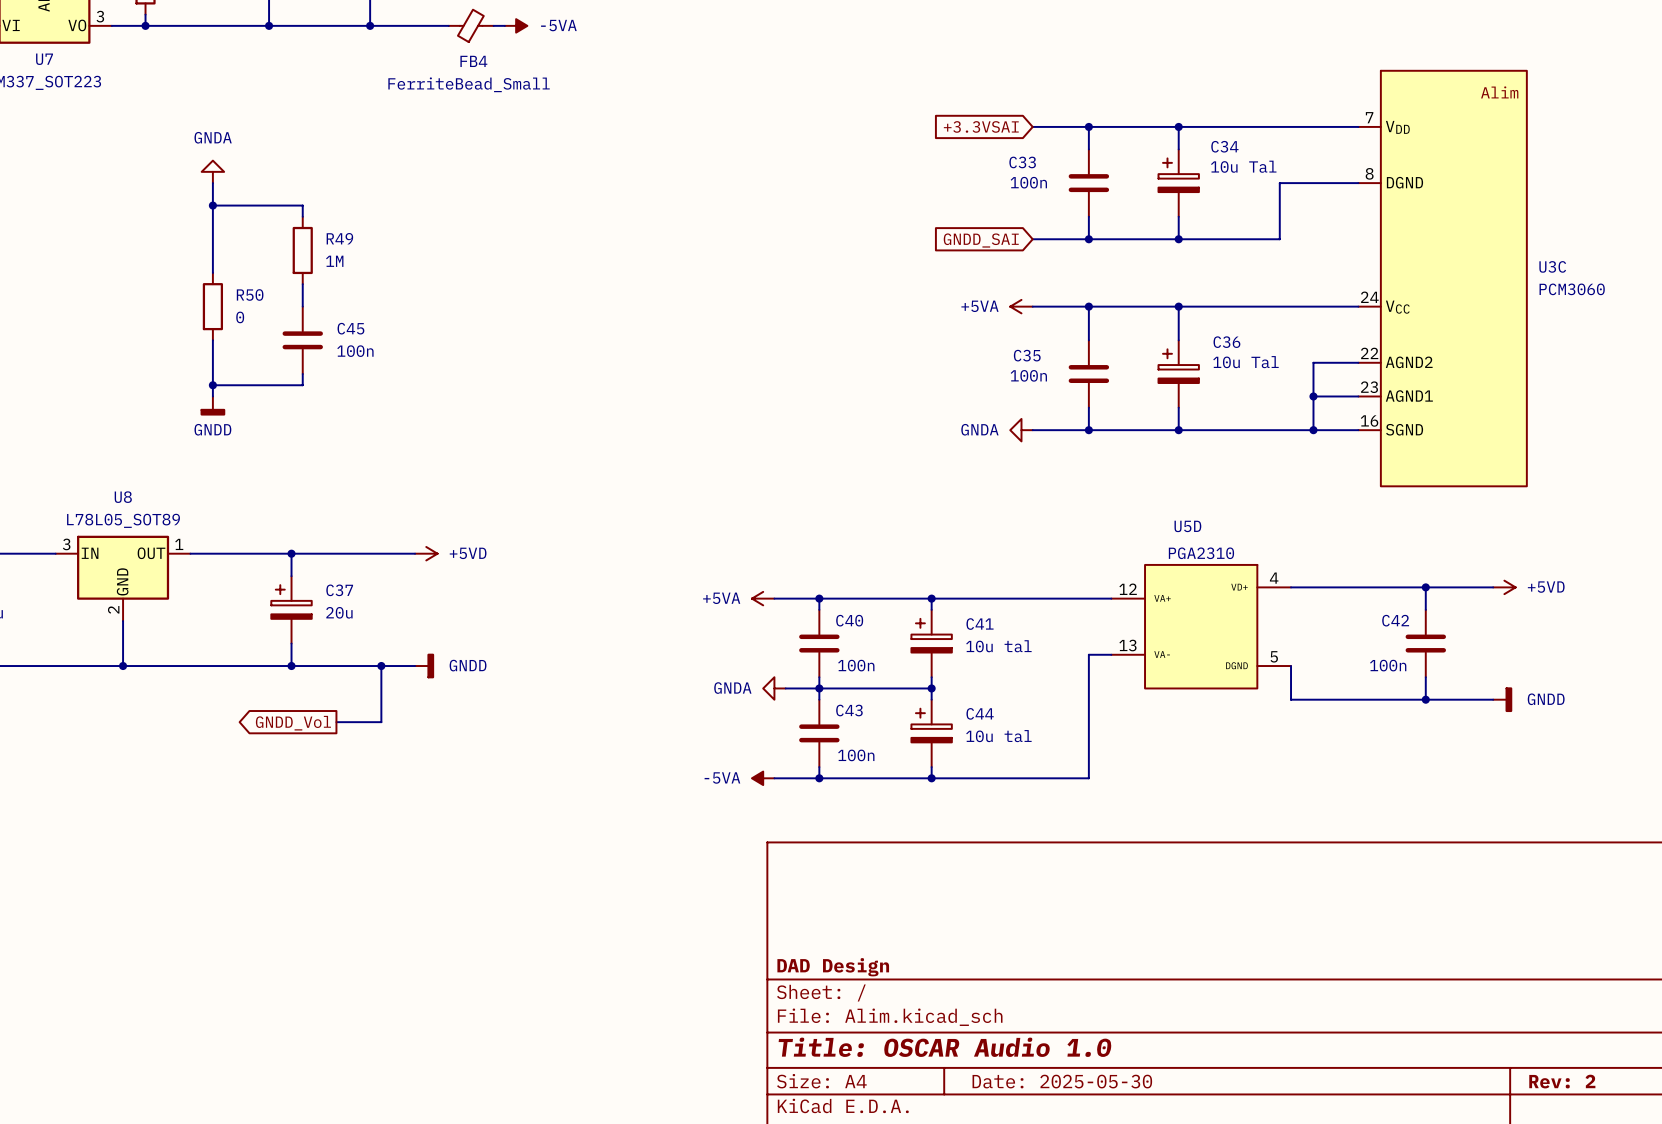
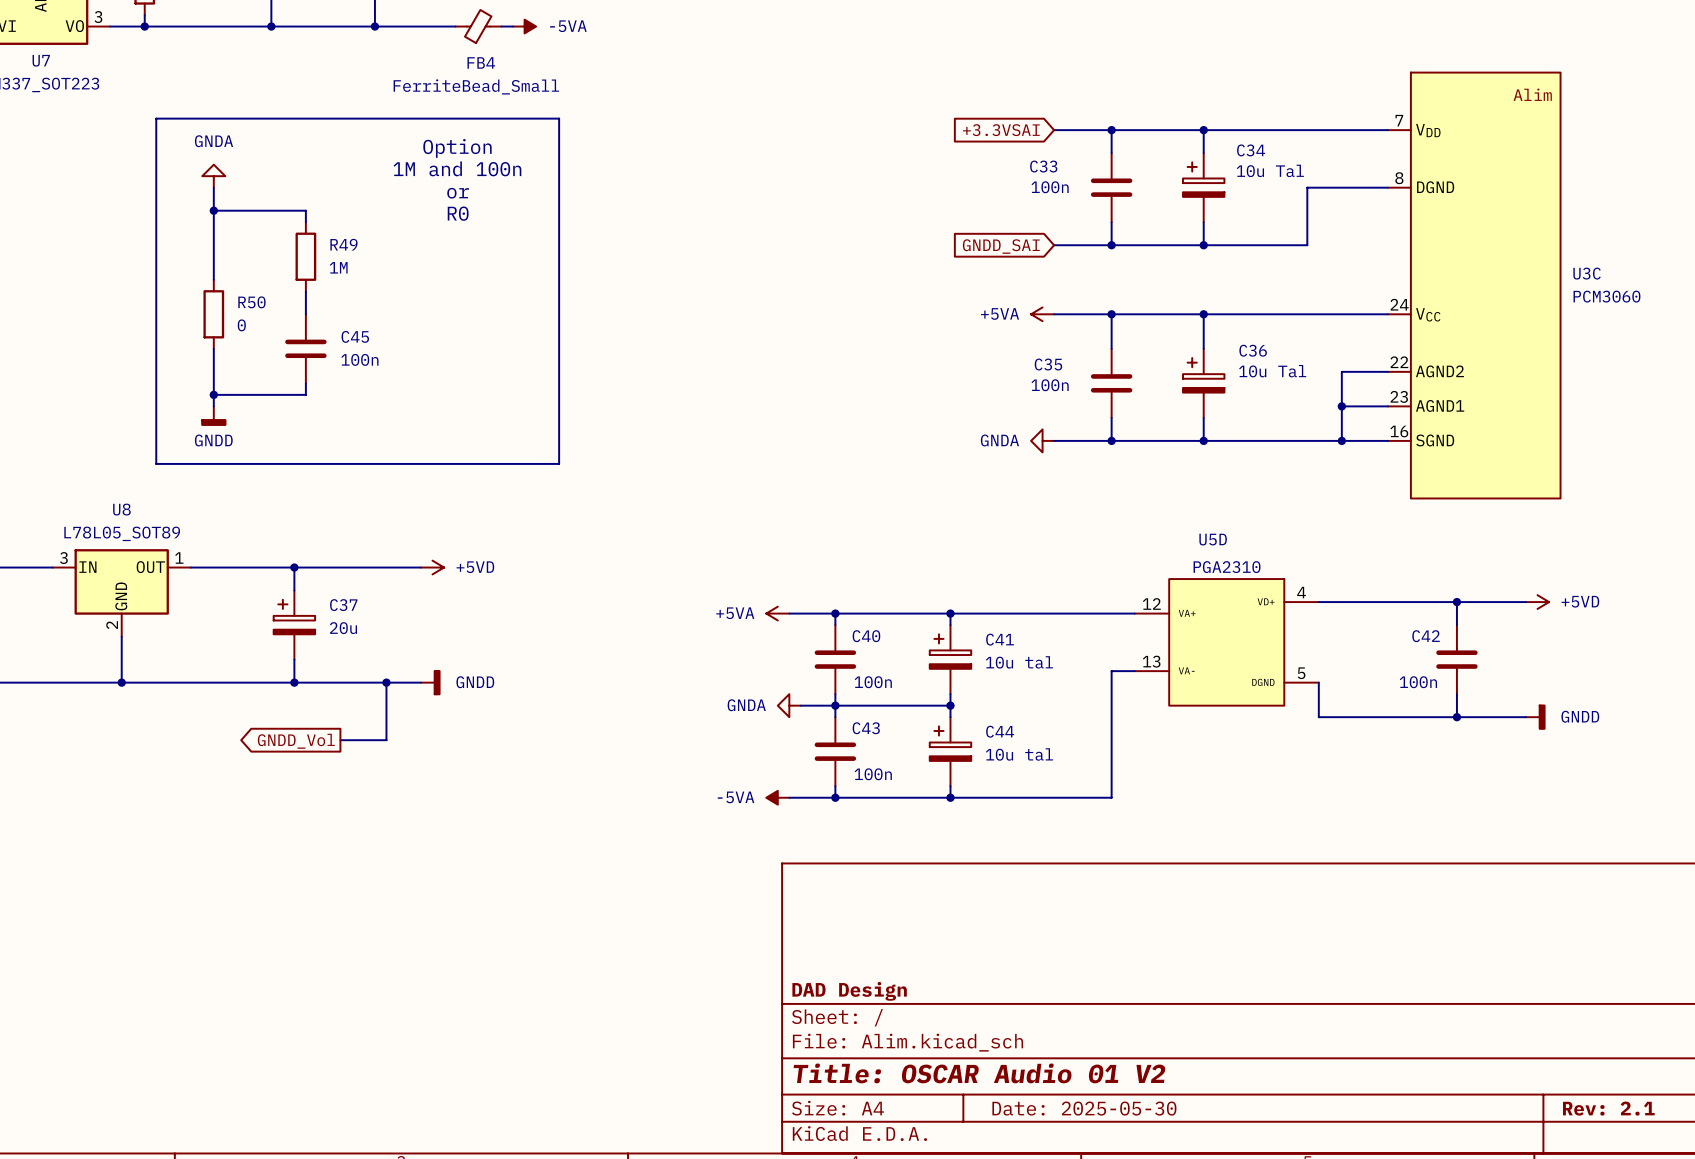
line: none -> (156, 118) (559, 118) (559, 463) (156, 463) (156, 118)
text: none -> Option (457, 148)
text: none -> 1M and 100n (457, 168)
text: none -> or (458, 193)
text: none -> R0 (458, 213)
title block: Title: OSCAR Audio 1.0 (945, 1047) -> Title: OSCAR Audio 01 V2 (979, 1073)
title block: Rev: 2 (1562, 1081) -> Rev: 2.1 (1608, 1108)

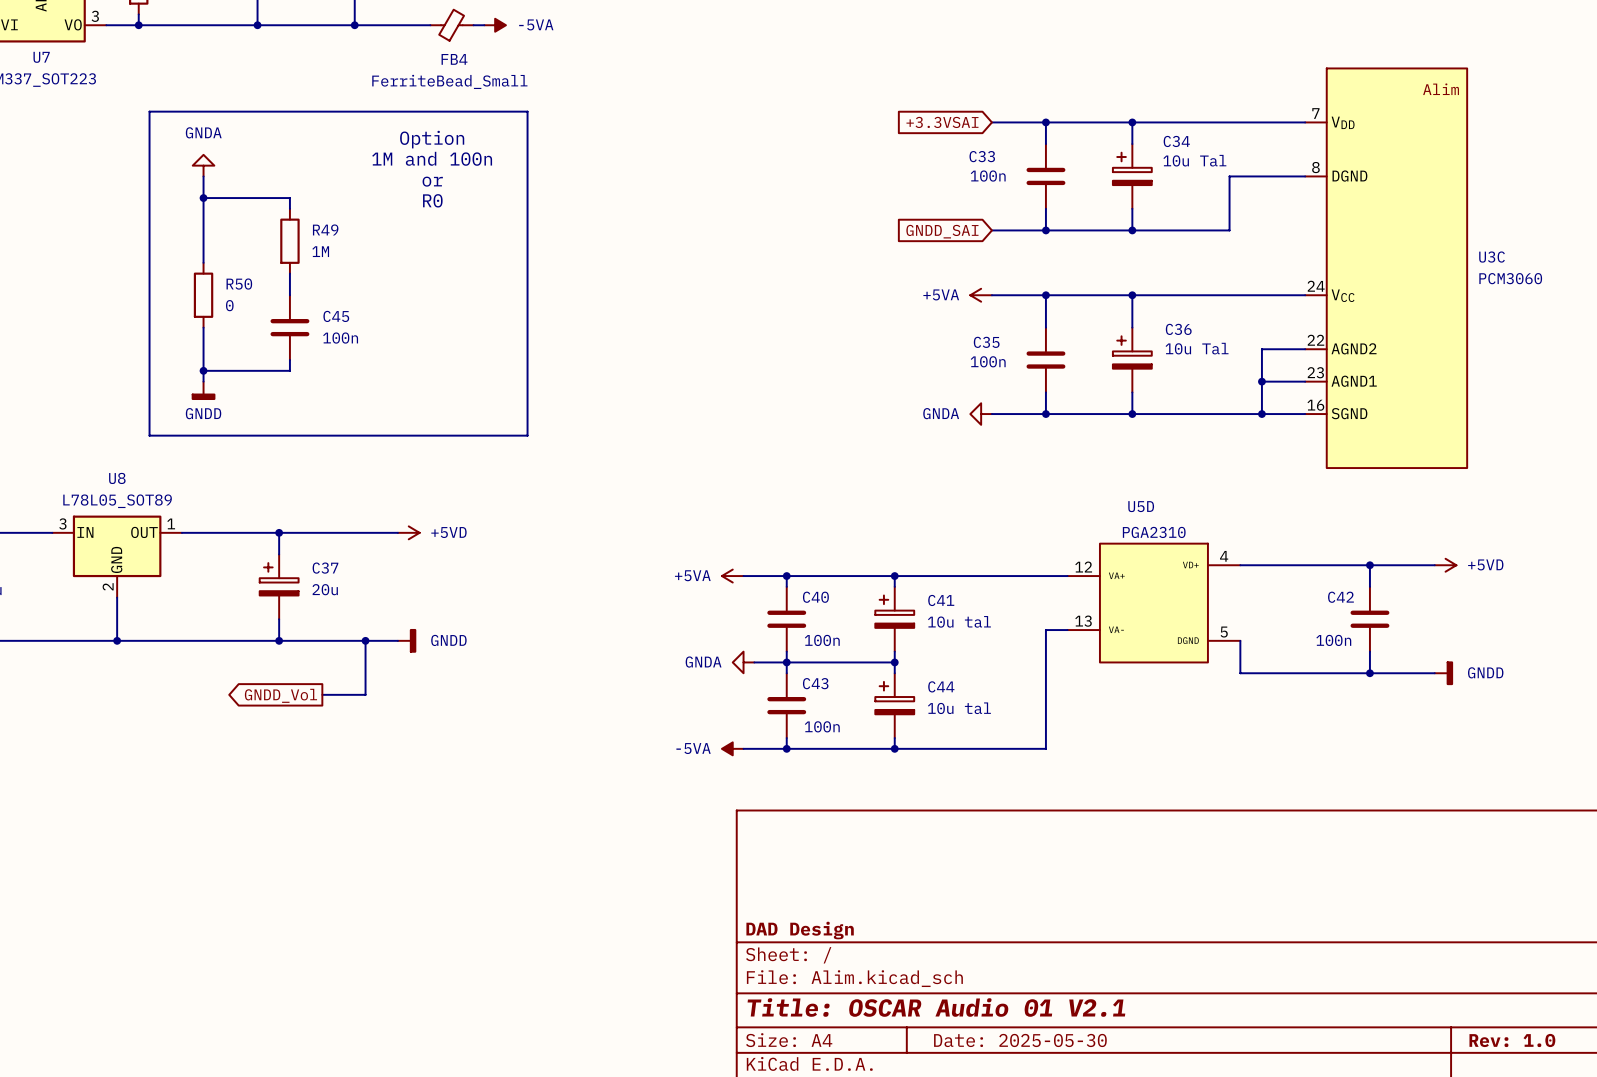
title block: Title: OSCAR Audio 01 V2 (979, 1073) -> Title: OSCAR Audio 01 V2.1 (936, 1007)
title block: Rev: 2.1 (1608, 1108) -> Rev: 1.0 (1512, 1040)

